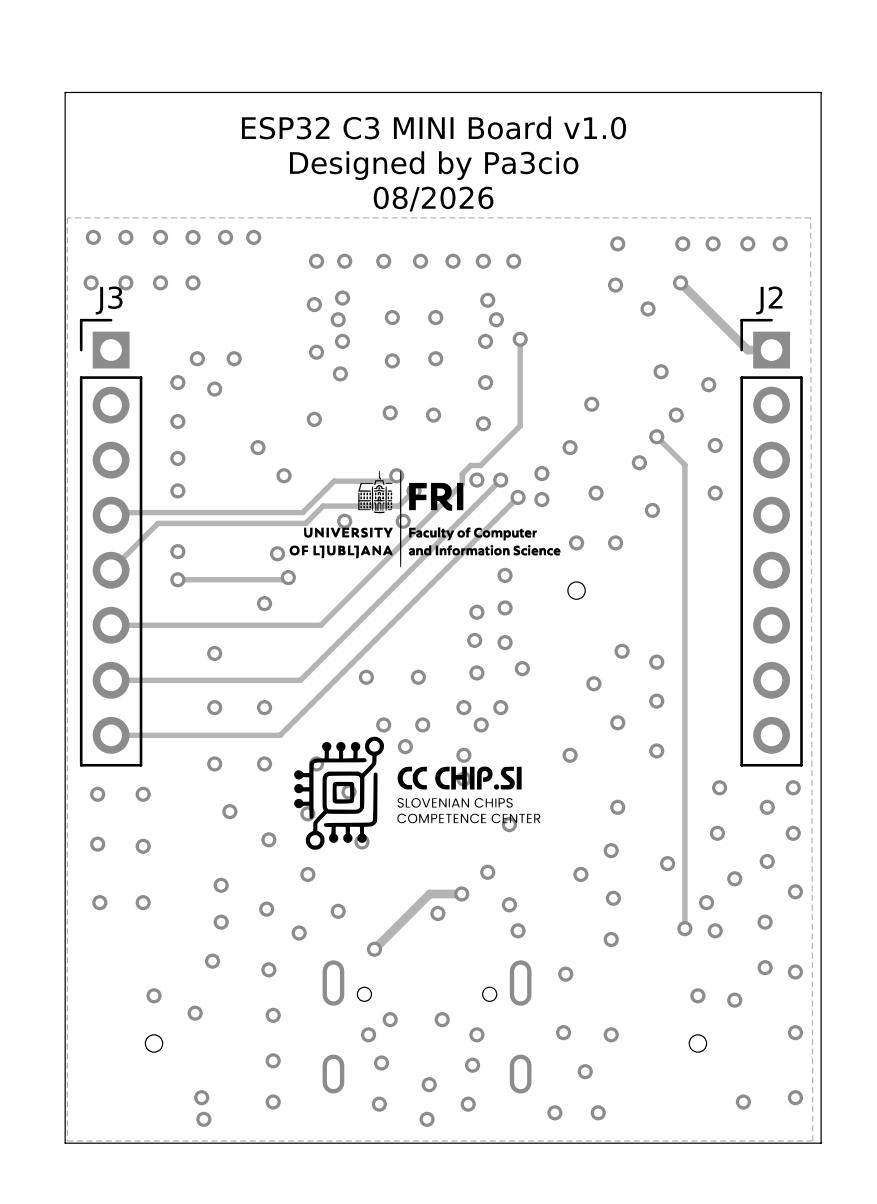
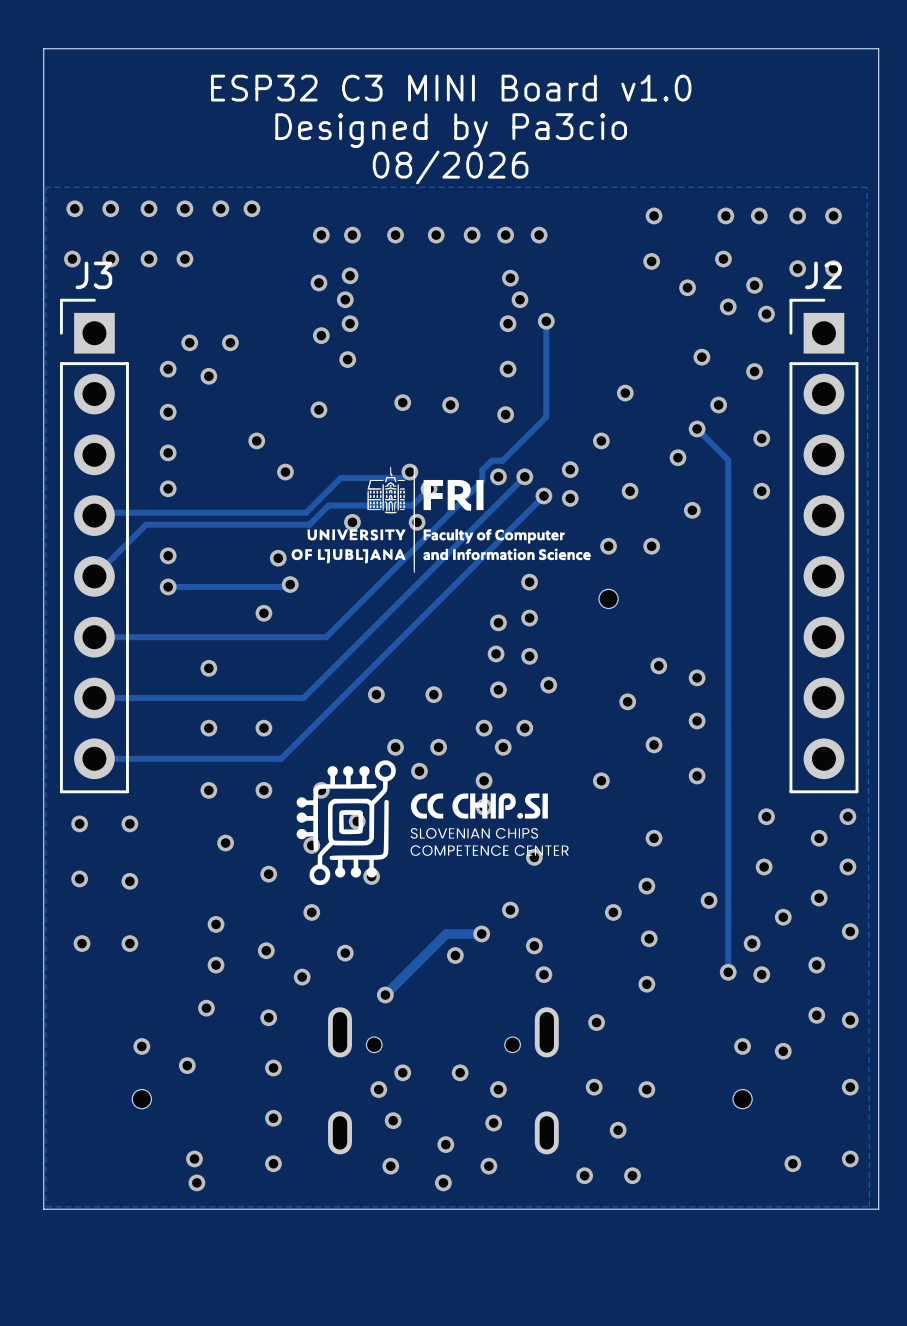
track: (680, 282) (747, 350) (771, 350) -> none
via: none -> (797, 268)
via: none -> (833, 268)
via: none -> (754, 285)
via: (392, 317) -> none
via: (435, 317) -> none
via: none -> (728, 306)
via: none -> (766, 314)
via: (435, 358) -> none
via: (392, 360) -> none

